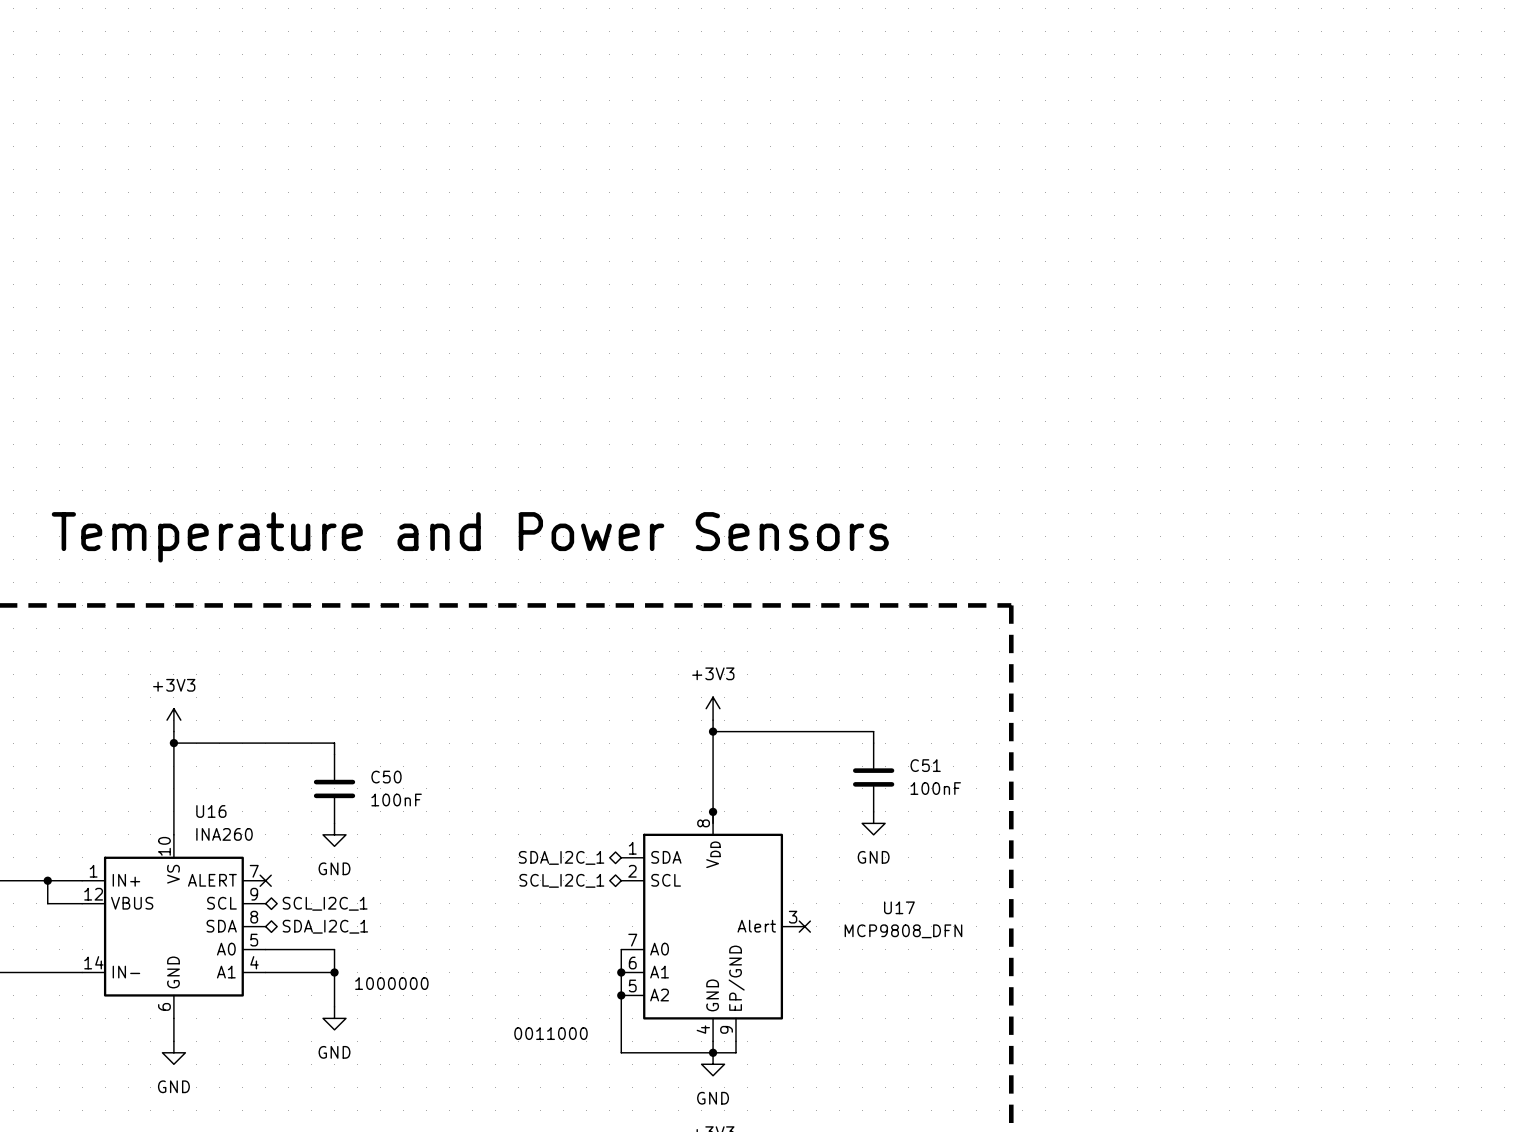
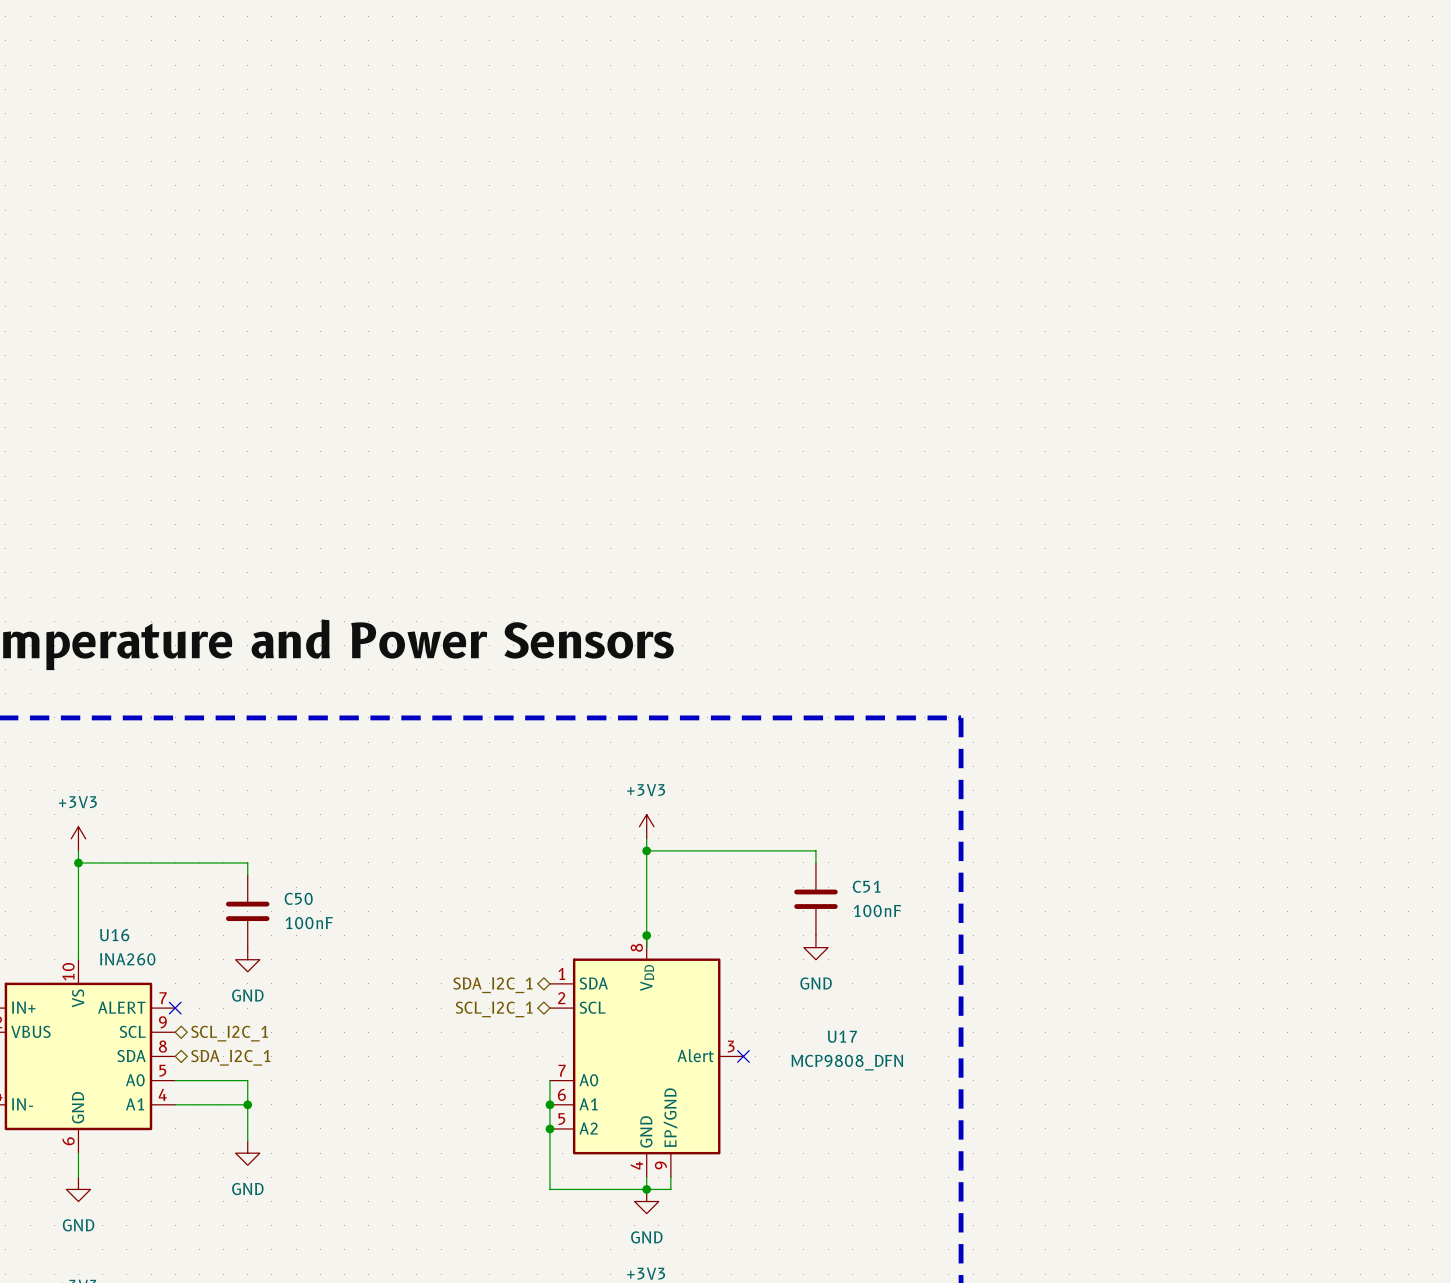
text: 1000000 (391, 983) -> none
text: 0011000 (550, 1033) -> none

